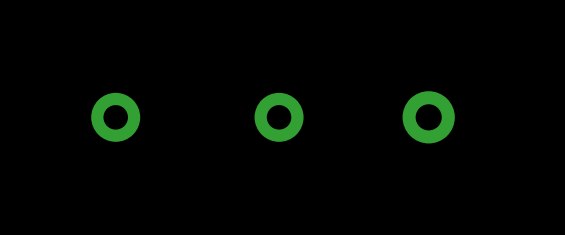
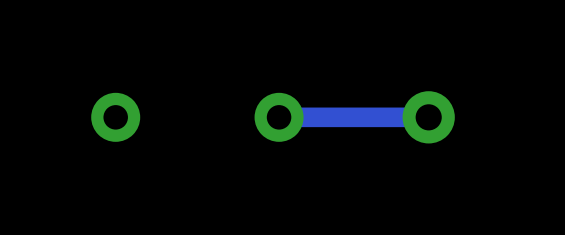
track: none -> (428, 117) (279, 117)

